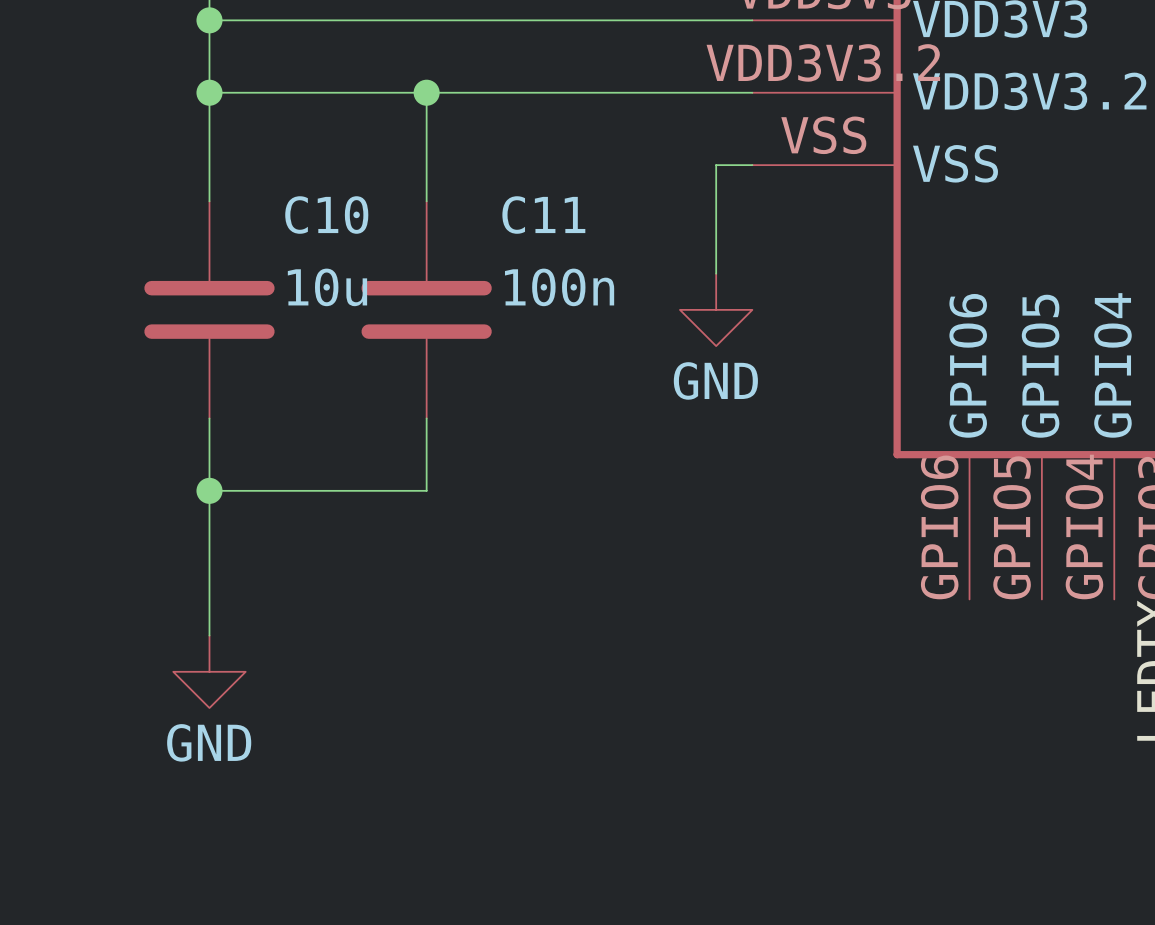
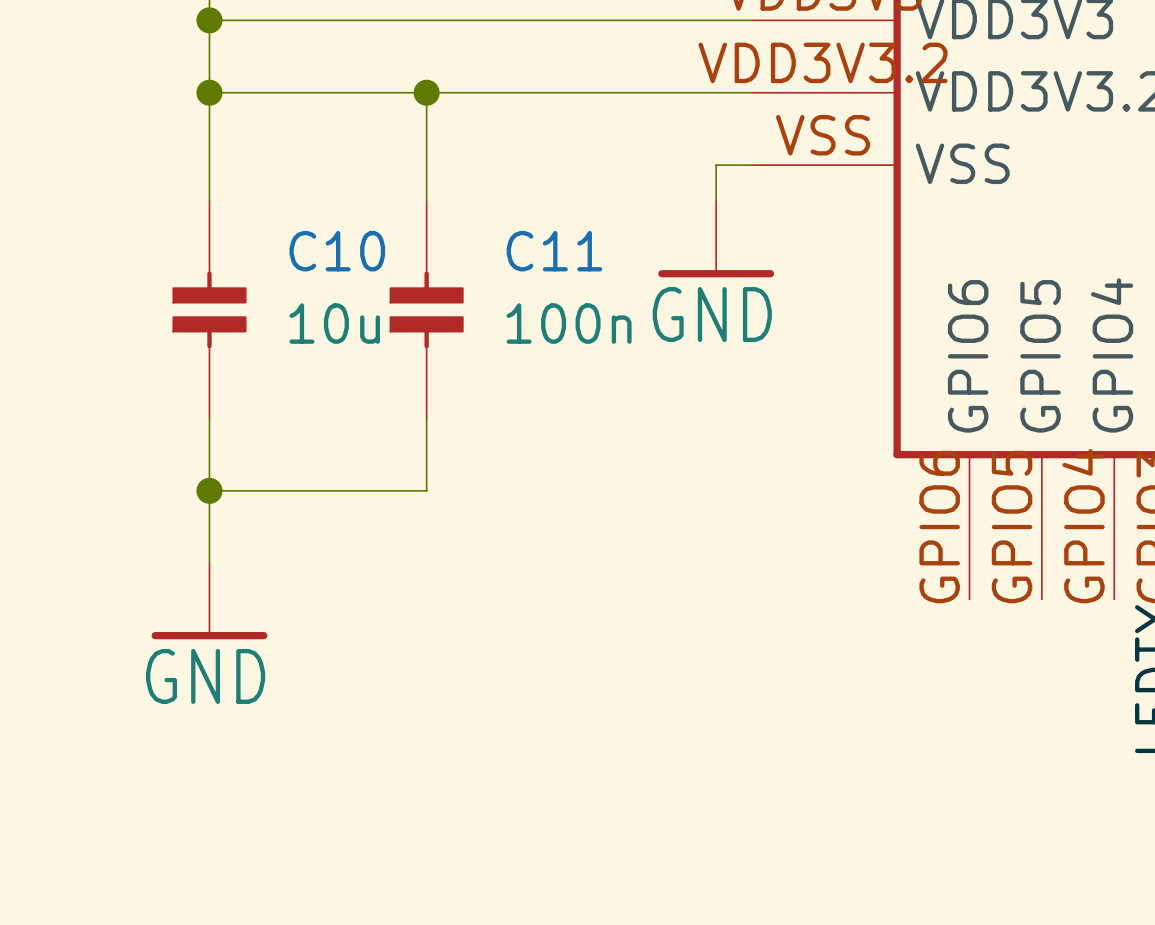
C10 symbol: [144, 201, 275, 419] -> [173, 201, 246, 419]
C11 symbol: [361, 201, 492, 419] -> [390, 201, 463, 419]
C10 name position: C10 (326, 215) -> C10 (337, 251)
C11 name position: C11 (543, 215) -> C11 (554, 251)
power symbol: none -> GND (716, 239)
C10 value position: 10u (327, 287) -> 10u (334, 323)
C11 value position: 100n (559, 287) -> 100n (569, 323)
power symbol: GND (716, 309) -> none
power symbol: none -> GND (209, 601)
power symbol: GND (209, 671) -> none

